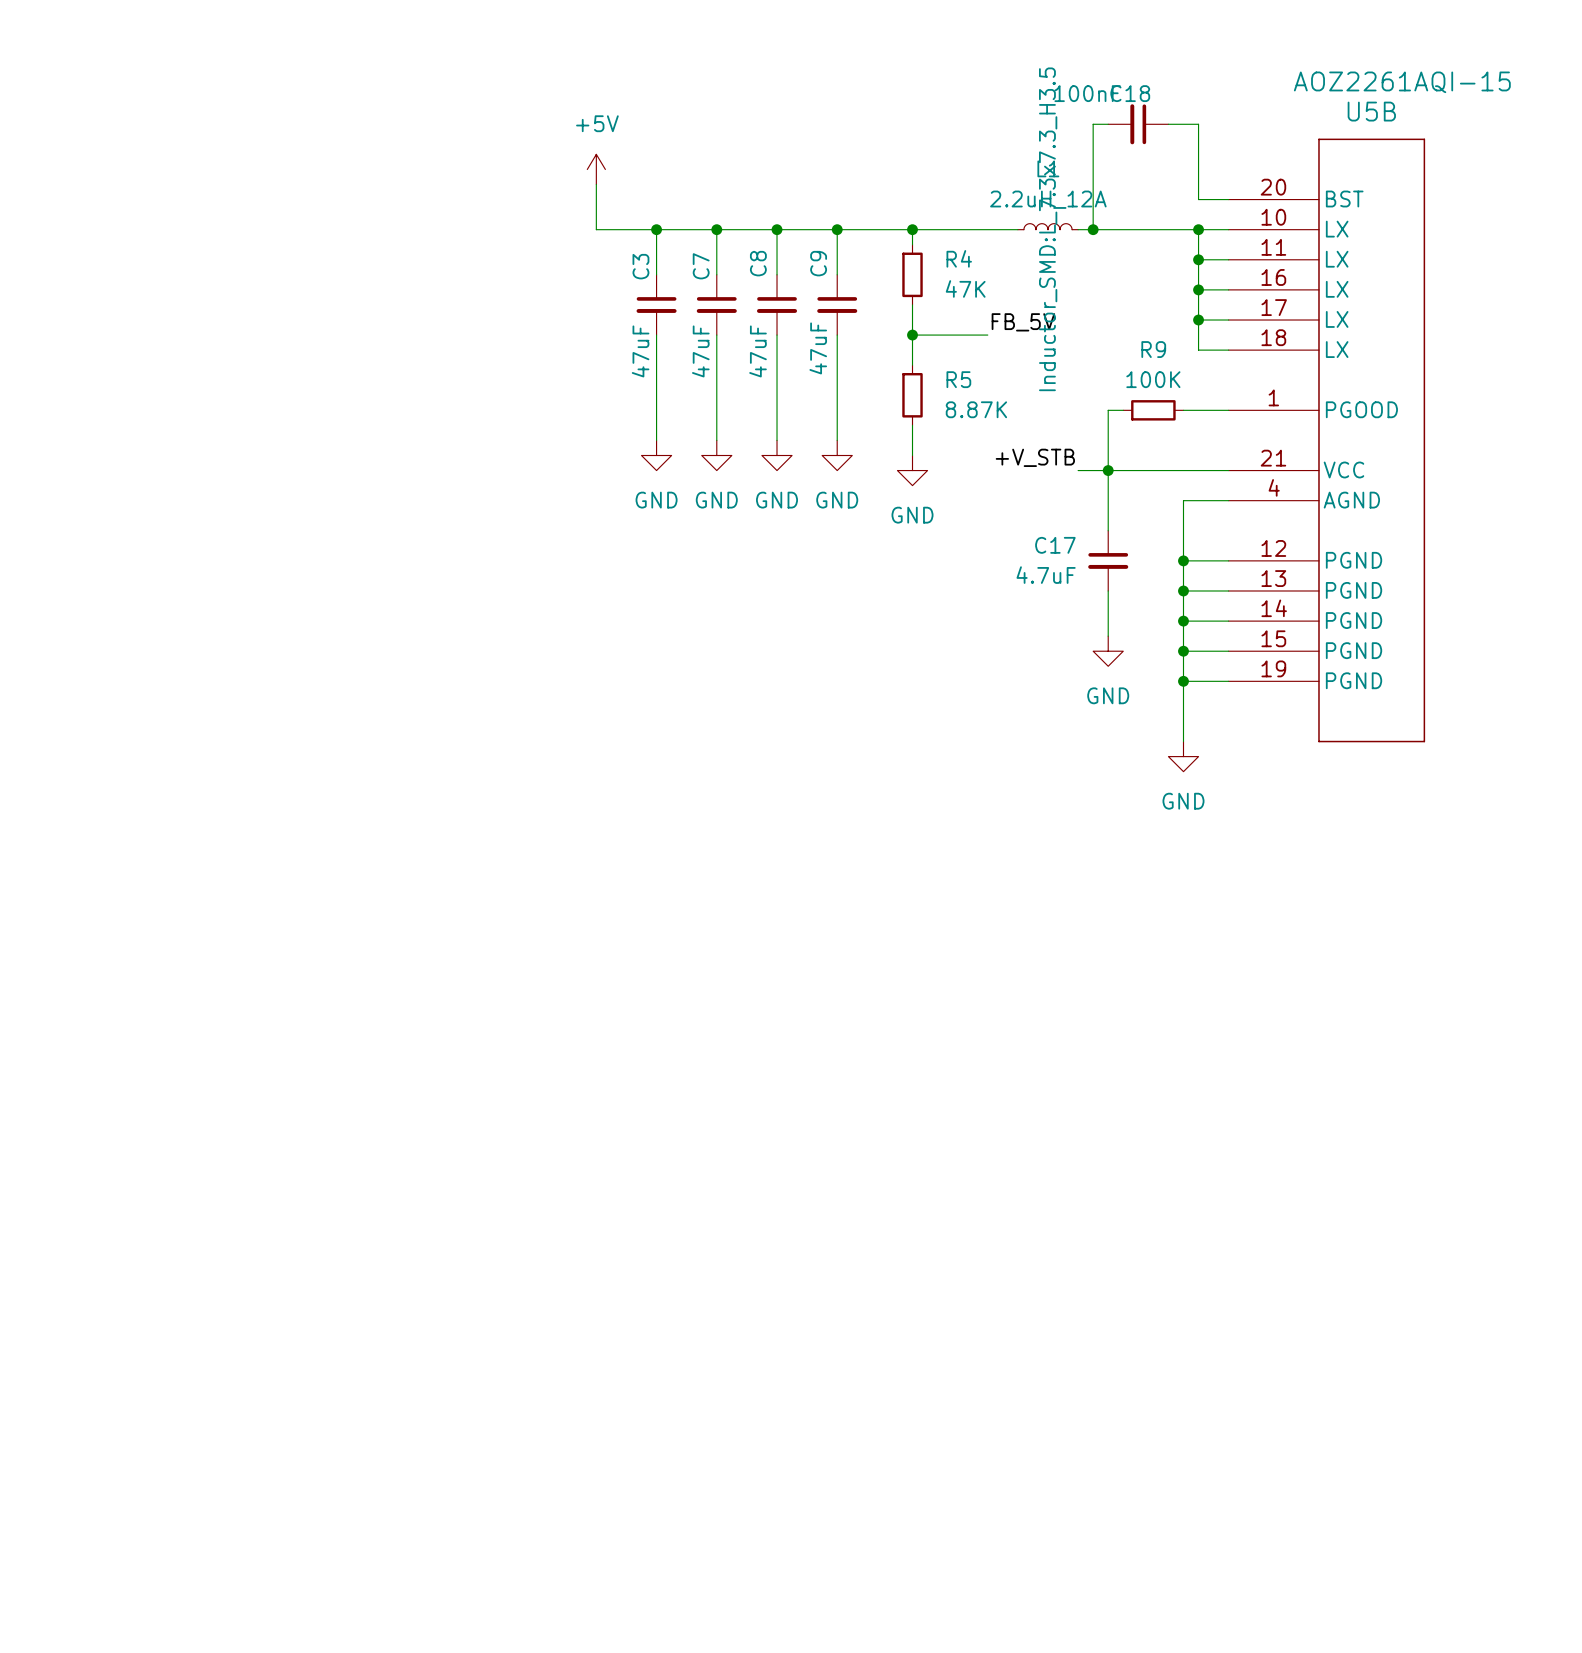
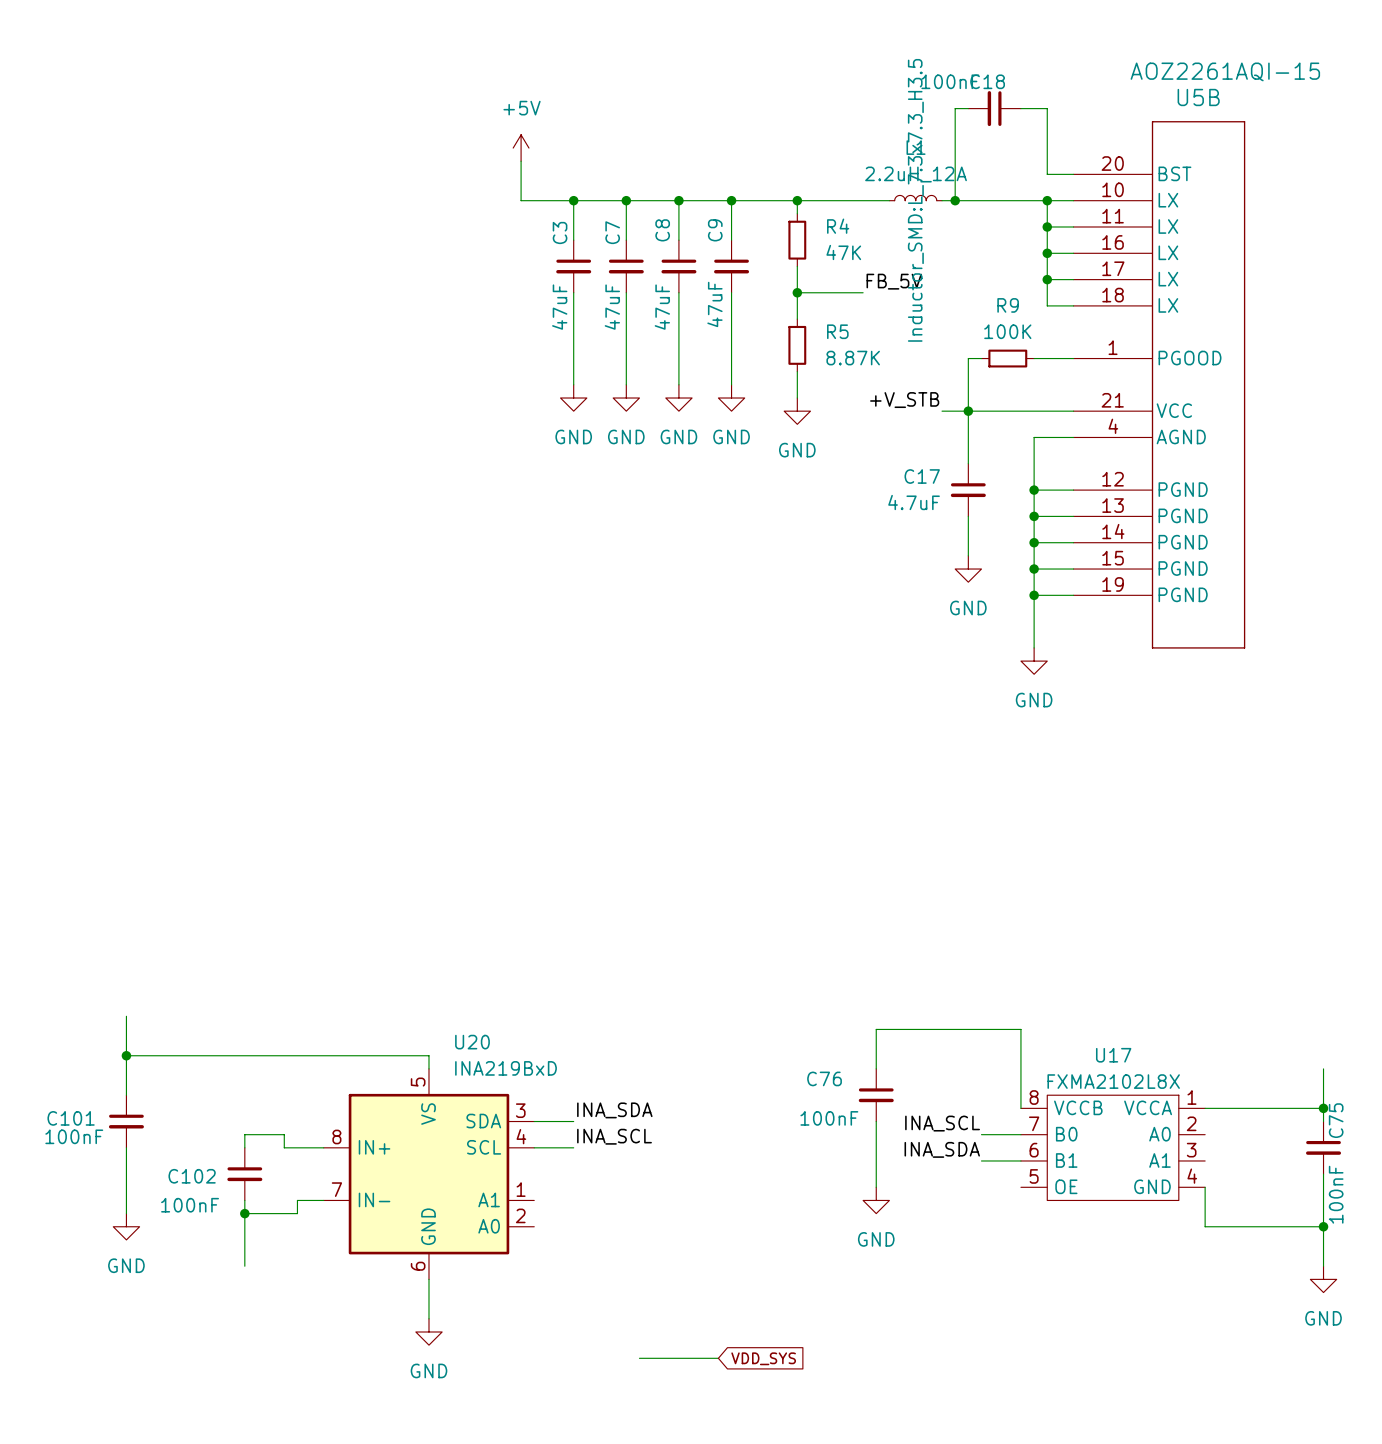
wire: none -> (126, 1016) (126, 1095)
wire: none -> (126, 1055) (428, 1055) (428, 1068)
junction: none -> (126, 1055)
wire: none -> (876, 1068) (876, 1029) (1020, 1029) (1020, 1108)
wire: none -> (1323, 1068) (1323, 1121)
C76: none -> 100nF (876, 1095)
wire: none -> (1205, 1108) (1323, 1108)
junction: none -> (1323, 1108)
label: none -> INA_SDA (614, 1110)
C101: none -> 100nF (126, 1121)
wire: none -> (534, 1121) (573, 1121)
wire: none -> (876, 1121) (876, 1187)
label: none -> INA_SCL (942, 1123)
wire: none -> (981, 1134) (1020, 1134)
label: none -> INA_SCL (614, 1136)
wire: none -> (126, 1147) (126, 1213)
wire: none -> (244, 1147) (244, 1134) (284, 1134) (284, 1147) (323, 1147)
wire: none -> (534, 1147) (573, 1147)
U17: none -> FXMA2102L8X (1113, 1147)
C75: none -> 100nF (1323, 1147)
label: none -> INA_SDA (942, 1149)
wire: none -> (981, 1160) (1020, 1160)
C102: none -> 100nF (244, 1174)
U20: none -> INA219BxD (428, 1174)
wire: none -> (1323, 1174) (1323, 1266)
wire: none -> (1205, 1187) (1205, 1226) (1323, 1226)
wire: none -> (244, 1200) (244, 1266)
wire: none -> (323, 1200) (297, 1200) (297, 1213) (244, 1213)
power symbol: none -> GND (876, 1200)
junction: none -> (244, 1213)
power symbol: none -> GND (126, 1226)
junction: none -> (1323, 1226)
wire: none -> (428, 1279) (428, 1318)
power symbol: none -> GND (1323, 1279)
power symbol: none -> GND (428, 1332)
wire: none -> (639, 1358) (718, 1358)
global label: none -> VDD_SYS (763, 1358)

